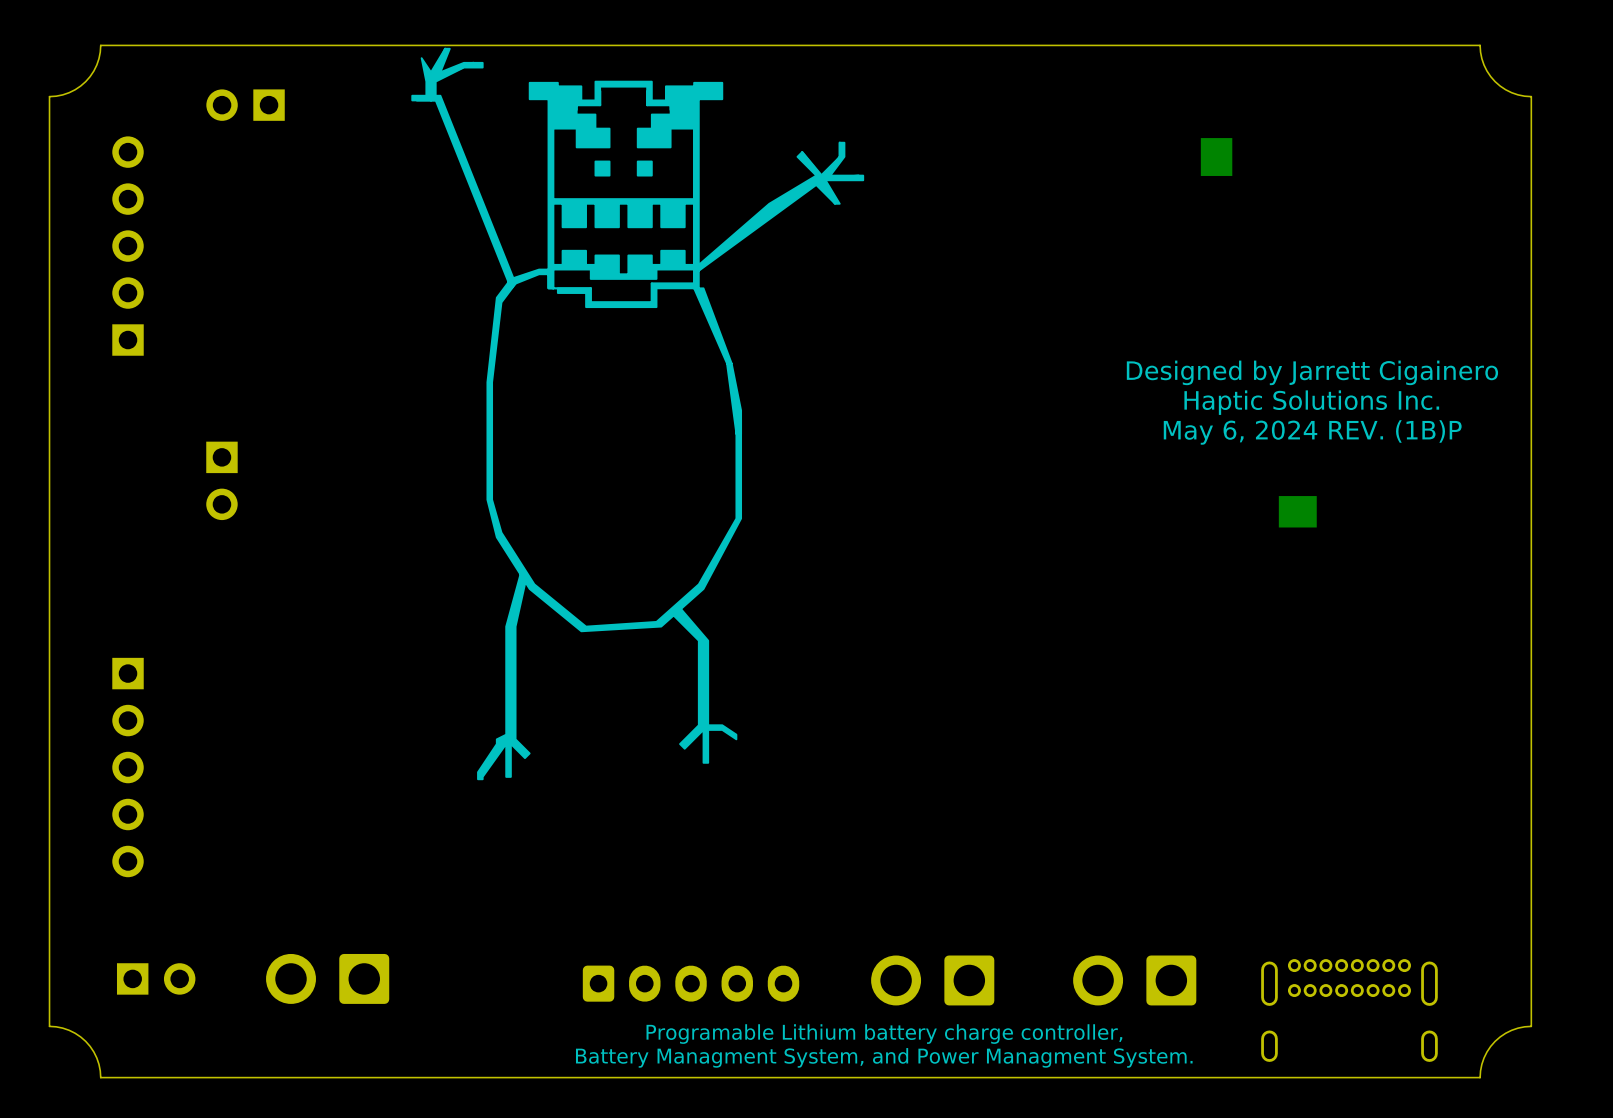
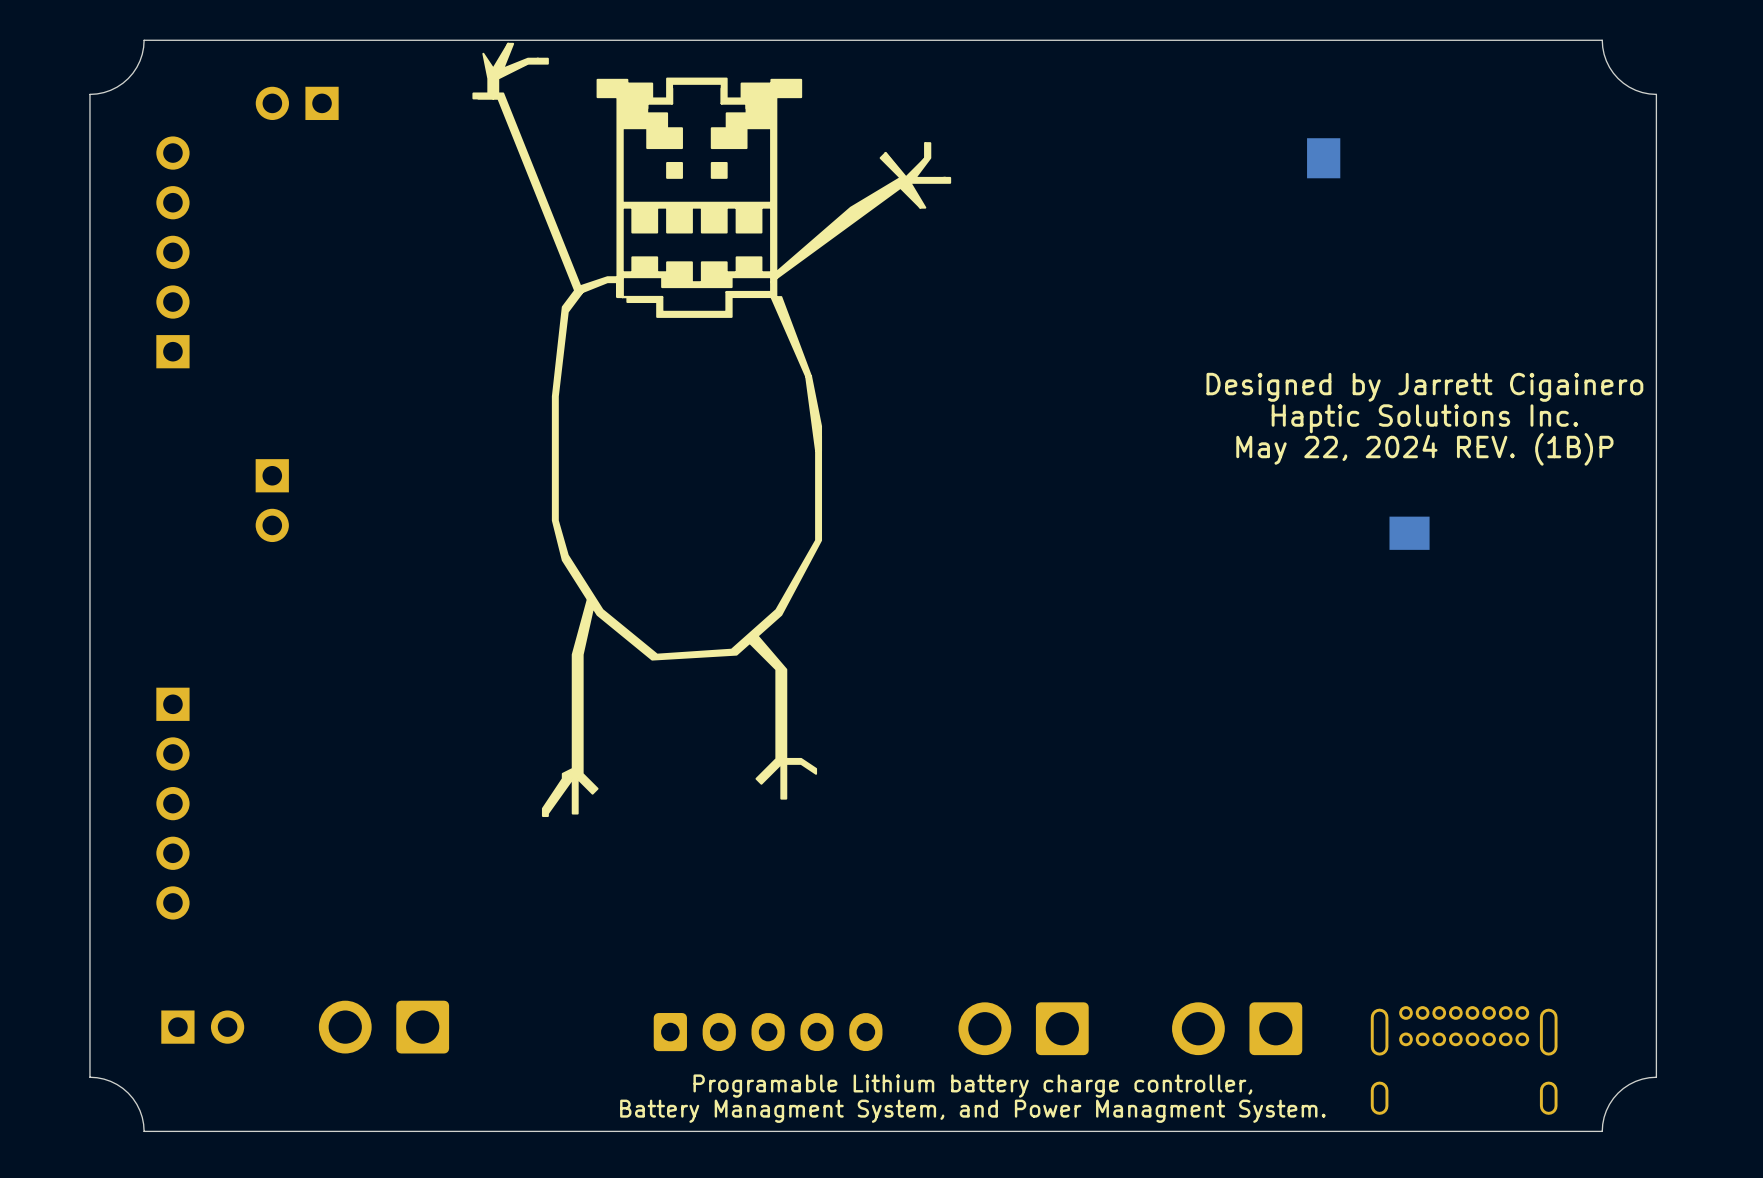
text: May 6, 2024 REV. (1B)P (1312, 432) -> May 22, 2024 REV. (1B)P (1424, 449)

